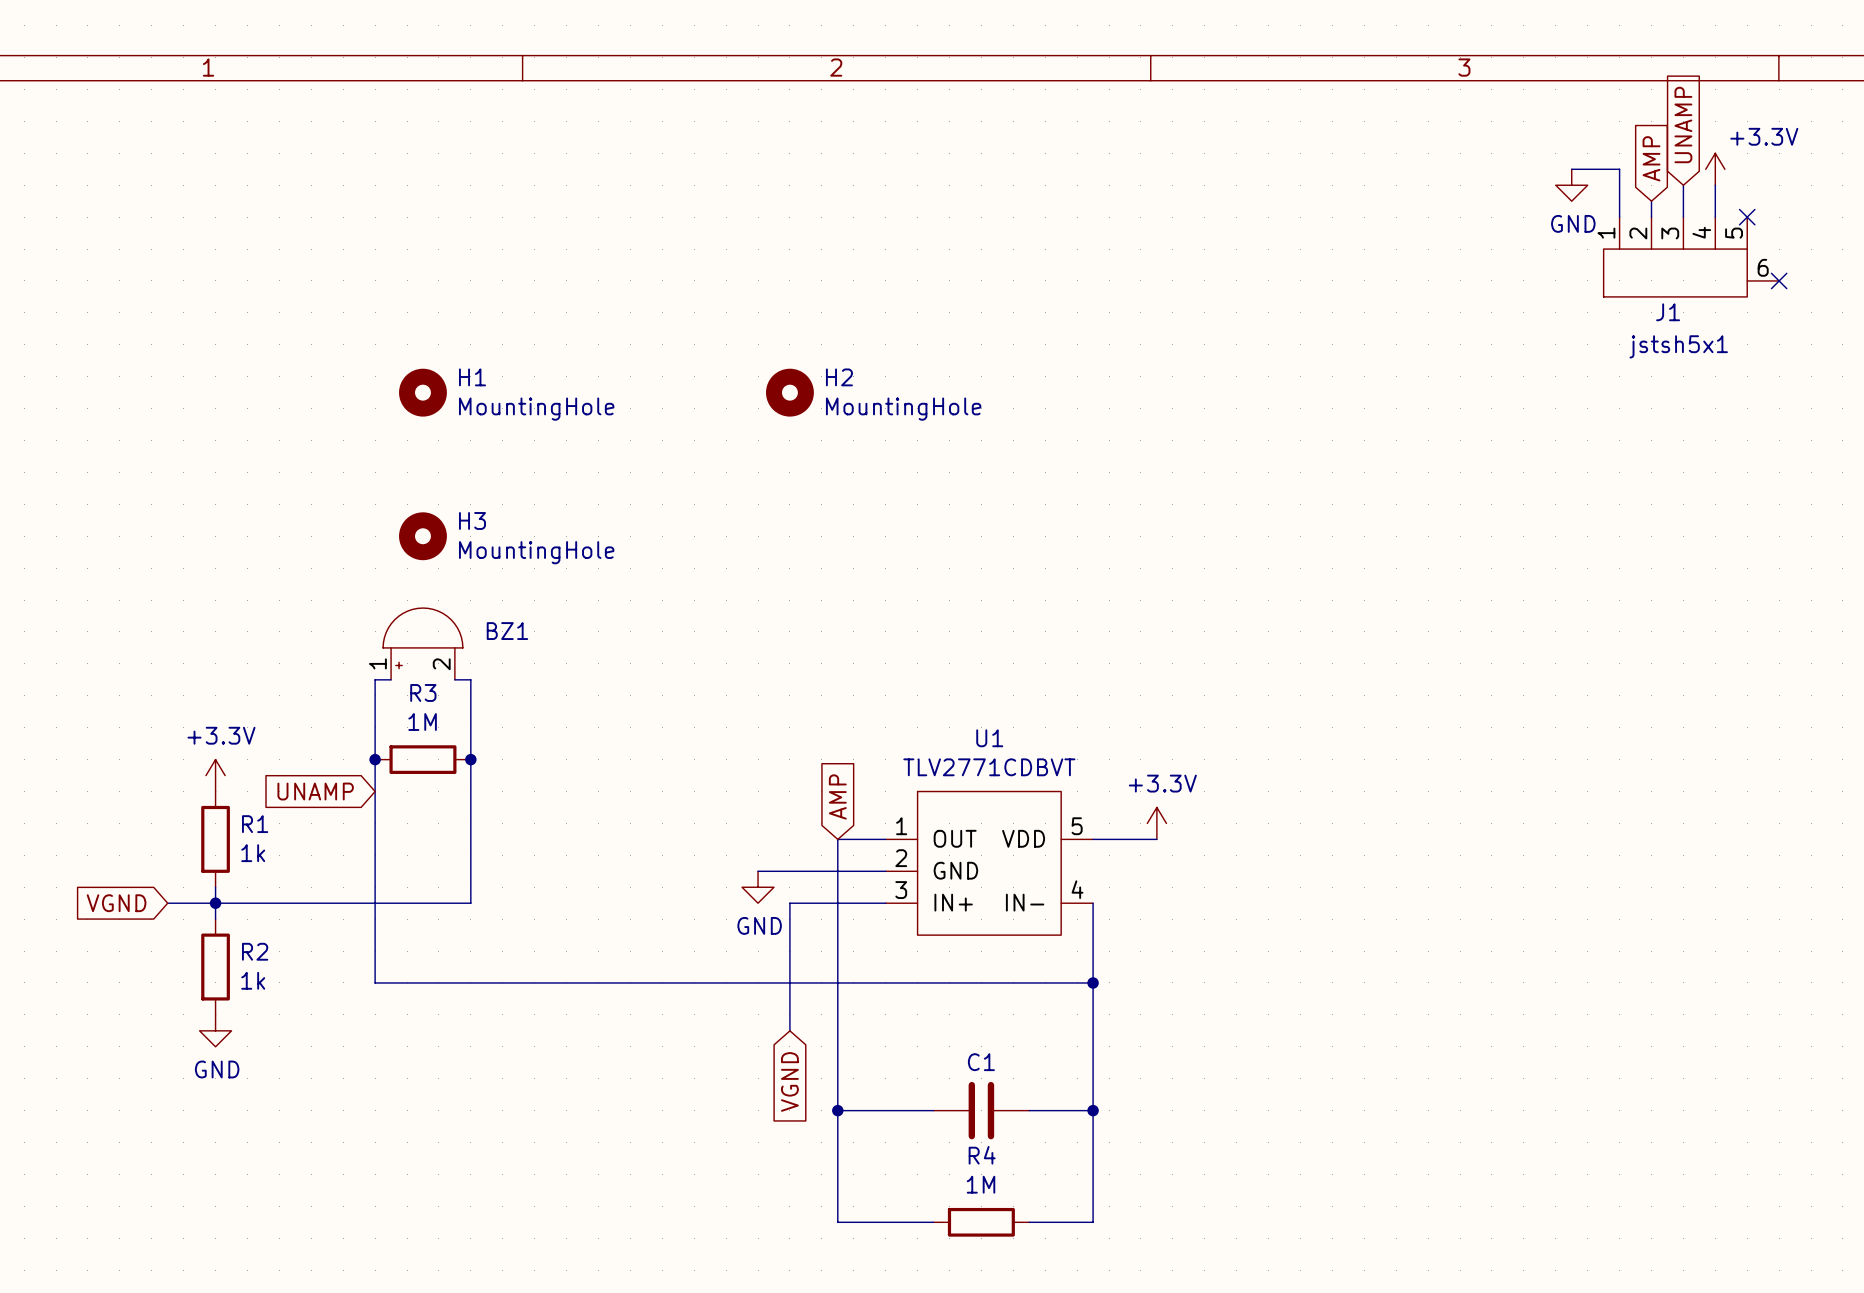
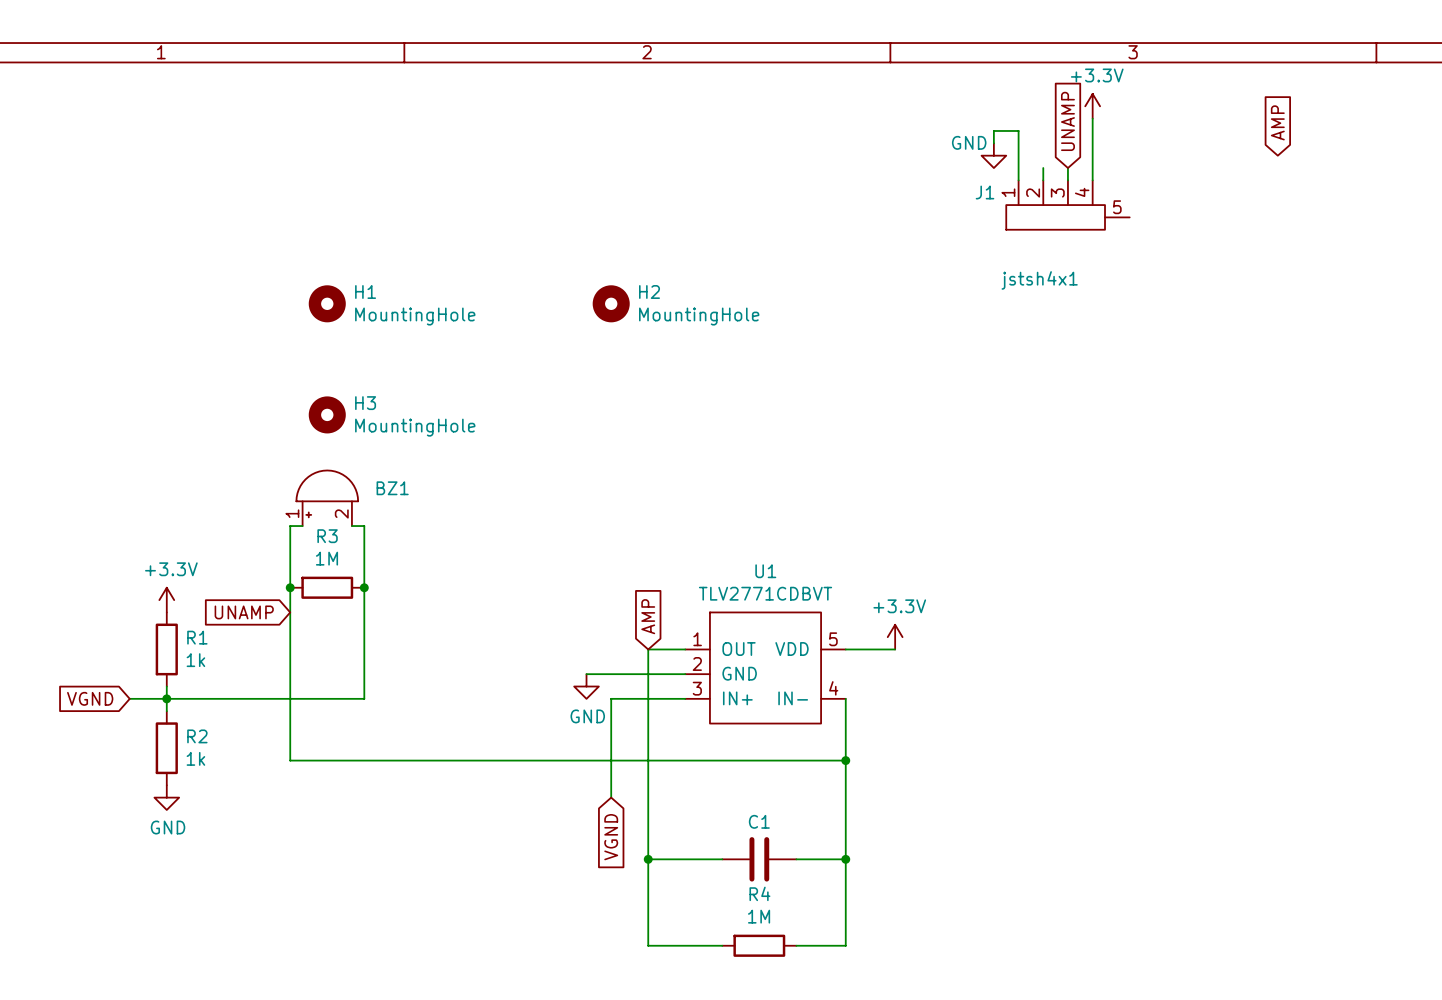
global label position: UNAMP (1683, 125) -> UNAMP (1067, 121)
power symbol text position: +3.3V (1764, 136) -> +3.3V (1097, 75)
wire: none -> (1092, 118) (1092, 180)
wire: (1571, 169) (1619, 169) (1619, 217) -> none
power symbol position: +3.3V (1715, 169) -> +3.3V (1092, 106)
wire: none -> (993, 143) (993, 130) (1018, 130) (1018, 180)
power symbol position: GND (1571, 185) -> GND (993, 155)
wire: (1683, 185) (1683, 217) -> none
wire: (1715, 185) (1715, 217) -> none
wire: (1651, 201) (1651, 217) -> (1067, 168) (1067, 180)
wire: none -> (1043, 168) (1043, 180)
J1 symbol: [1603, 217, 1780, 297] -> [1006, 180, 1130, 230]
no-connect mark: (1747, 217) -> none
power symbol text position: GND (1573, 223) -> GND (969, 142)
no-connect mark: (1779, 280) -> none
J1 name position: J1 (1668, 312) -> J1 (985, 192)
J1 value: jstsh5x1 (1678, 346) -> jstsh4x1 (1039, 280)

